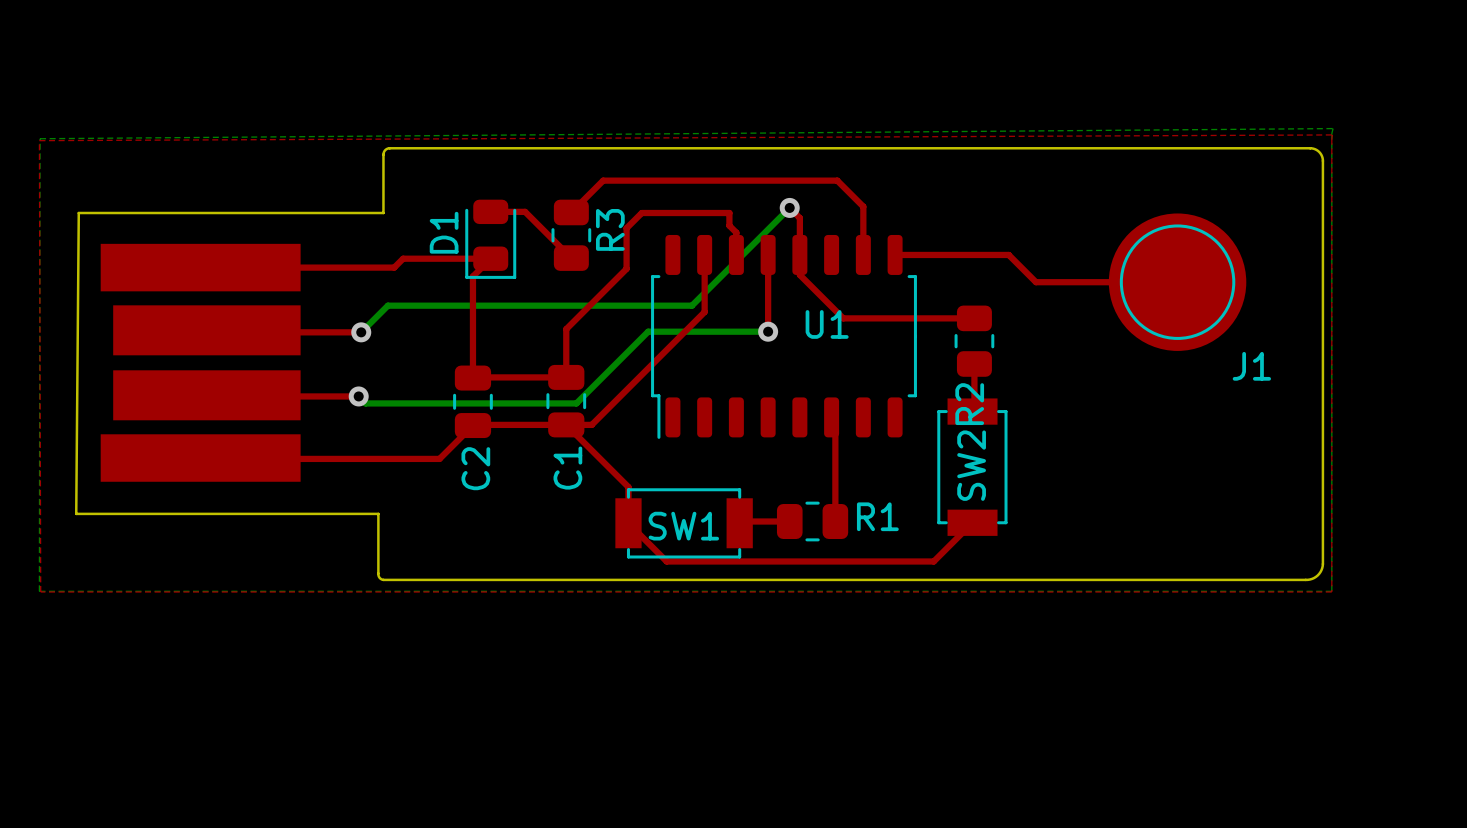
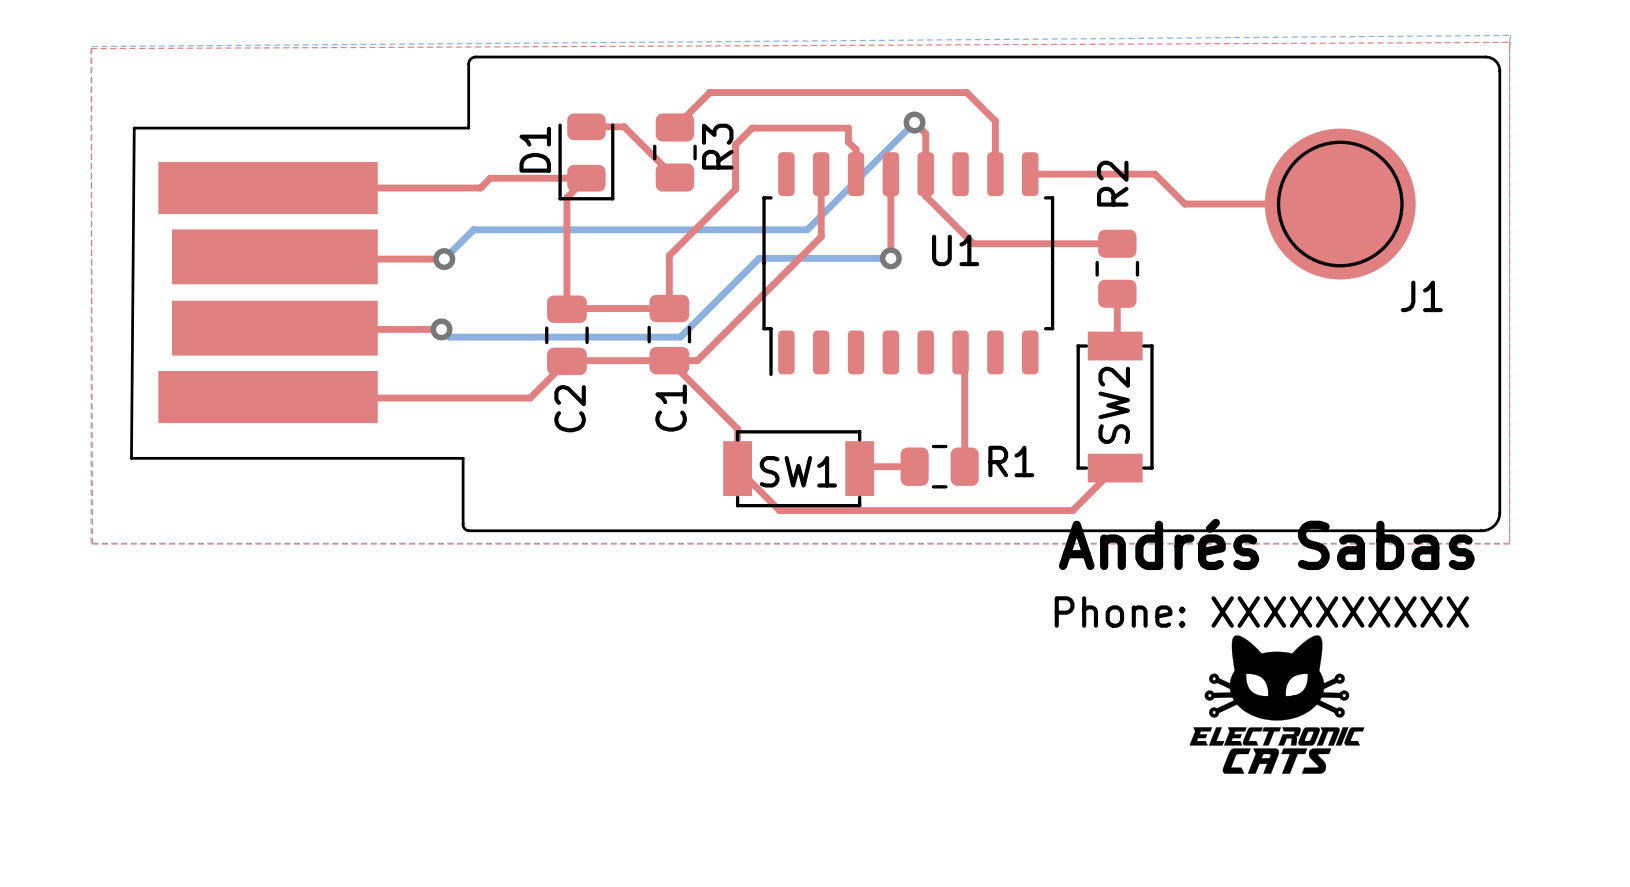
R2 name position: R2 (969, 404) -> R2 (1112, 183)
text: none -> Andrés Sabas (1266, 544)
text: none -> Phone: XXXXXXXXXX (1261, 611)
drawing: none -> [1189, 635, 1365, 774]

